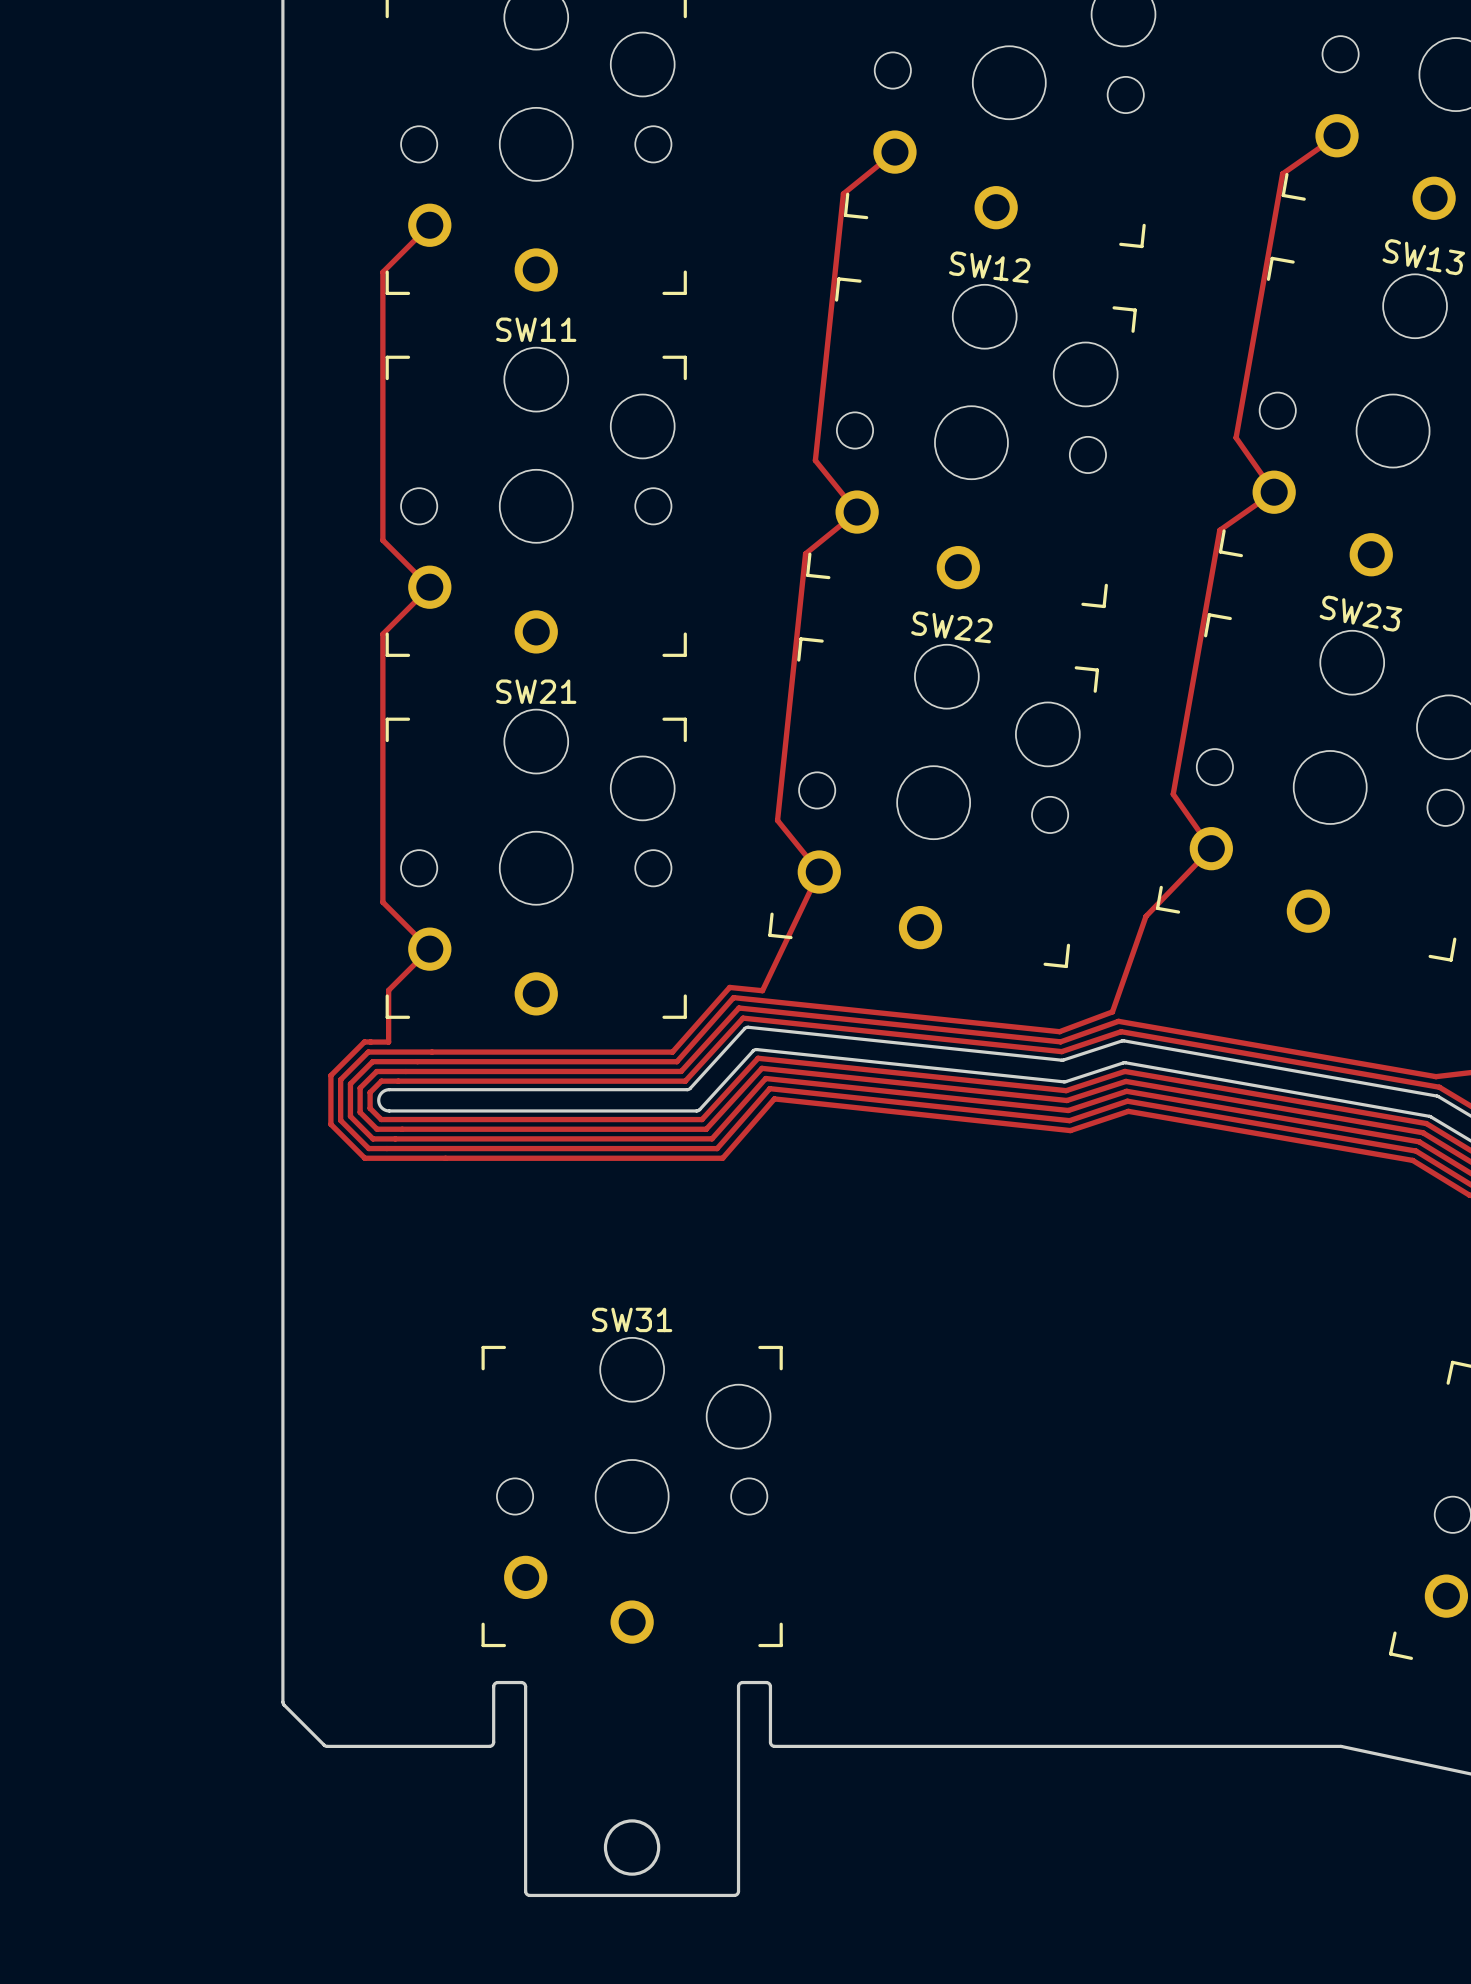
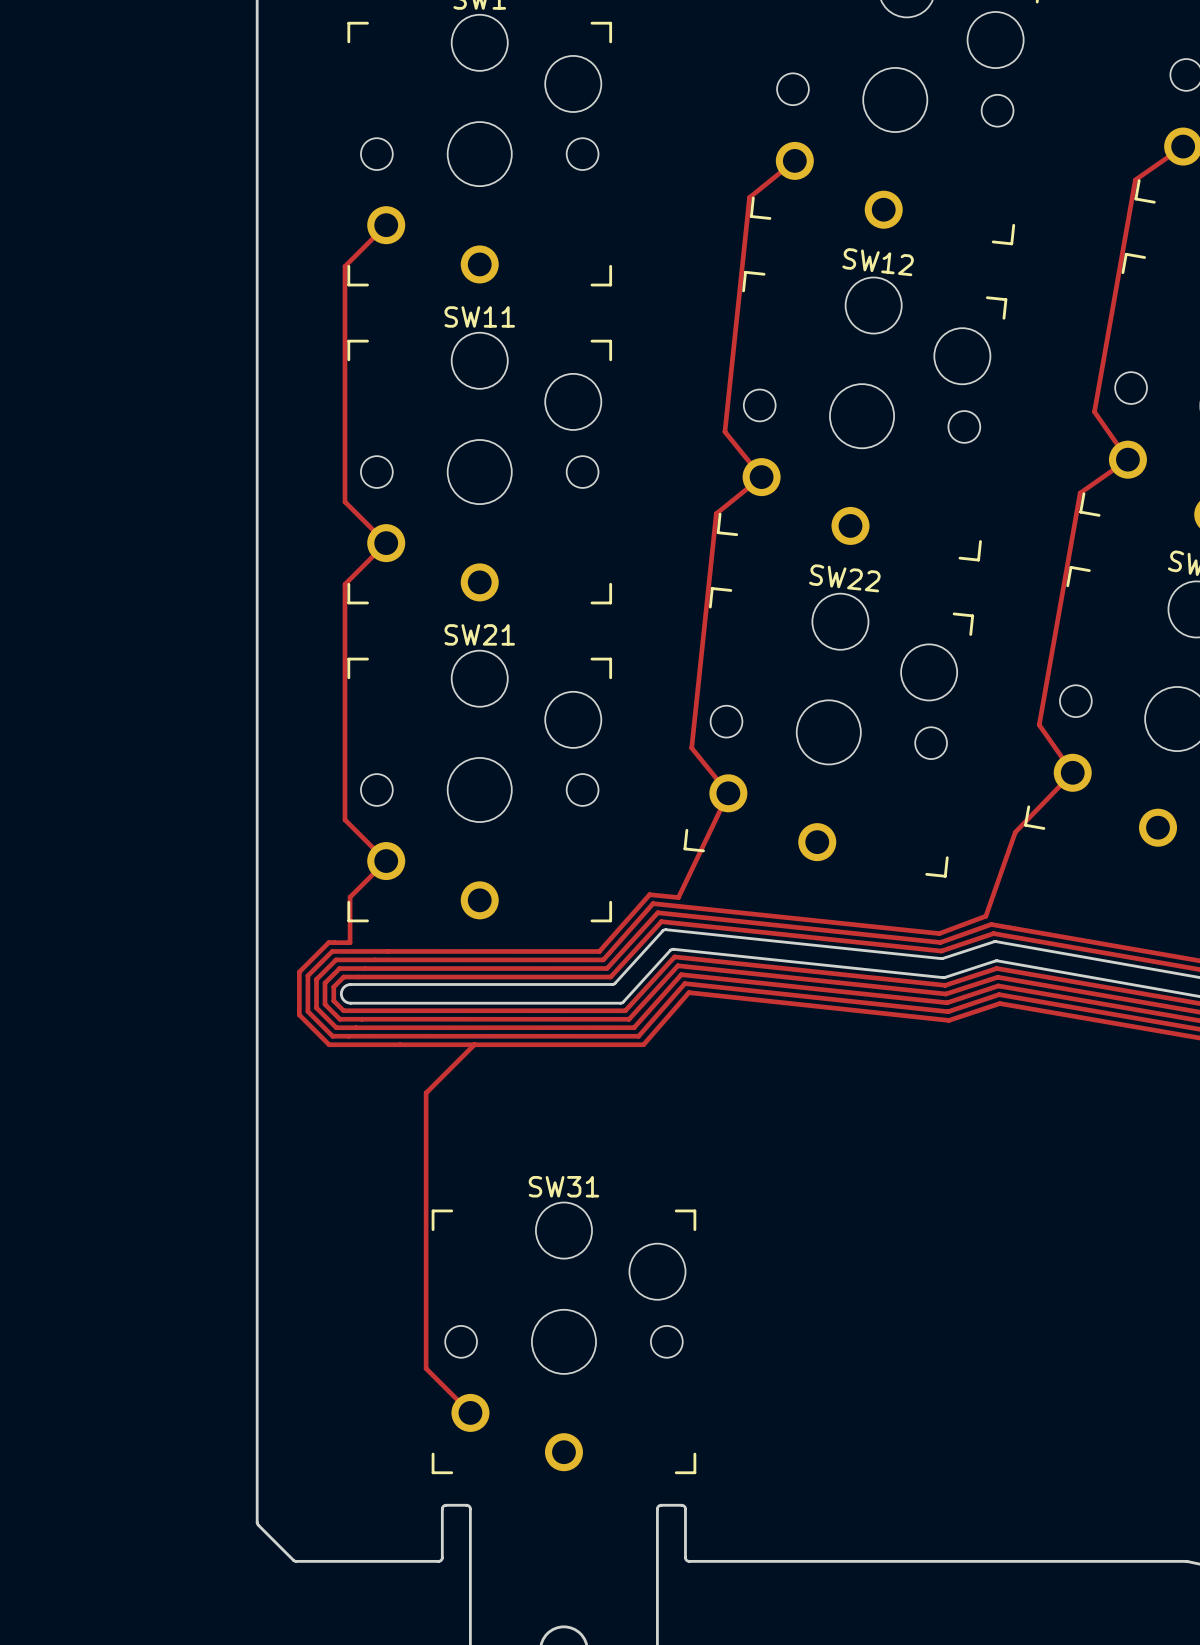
track: none -> (474, 1044) (426, 1093) (426, 1368) (470, 1412)

